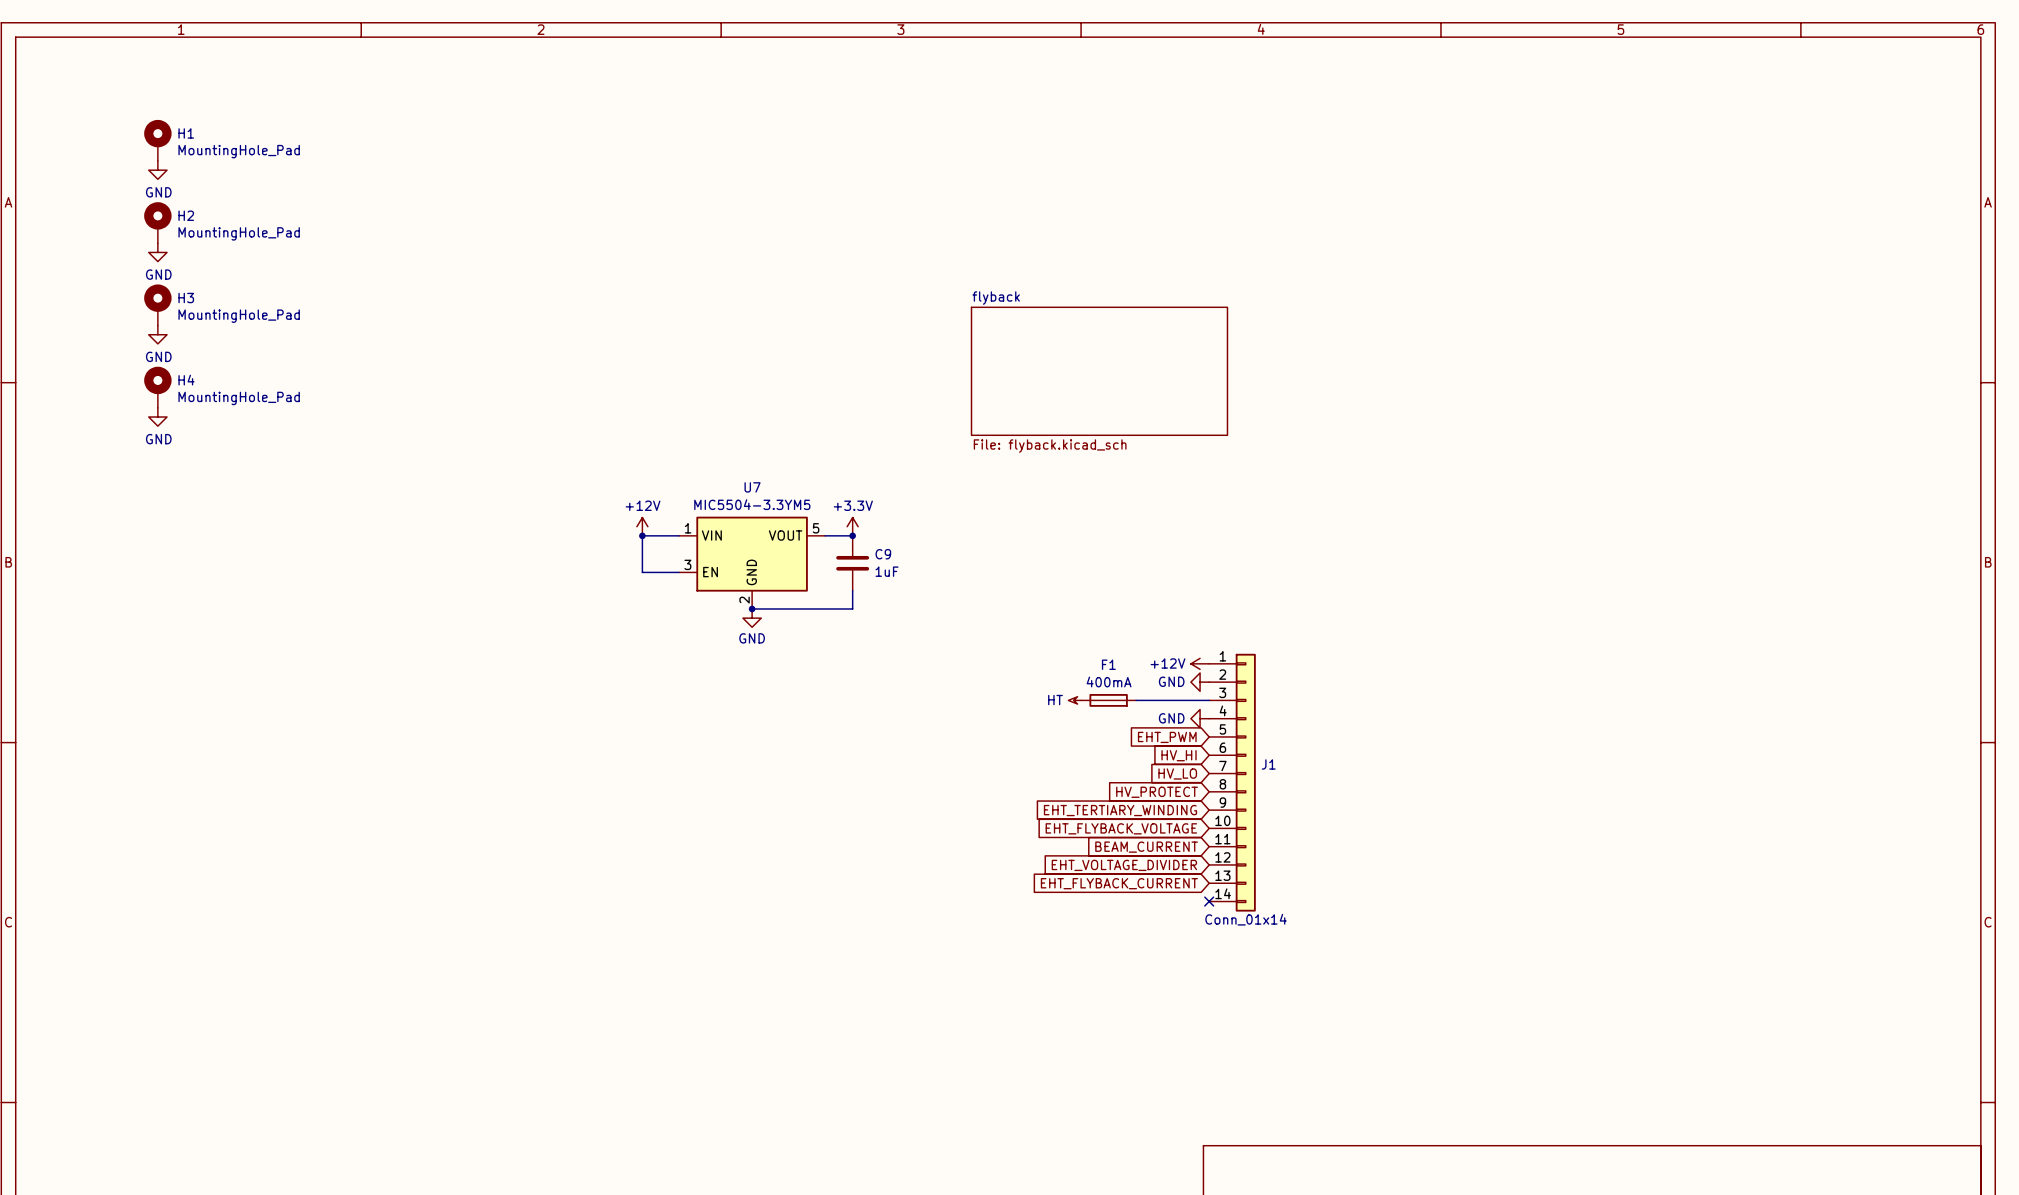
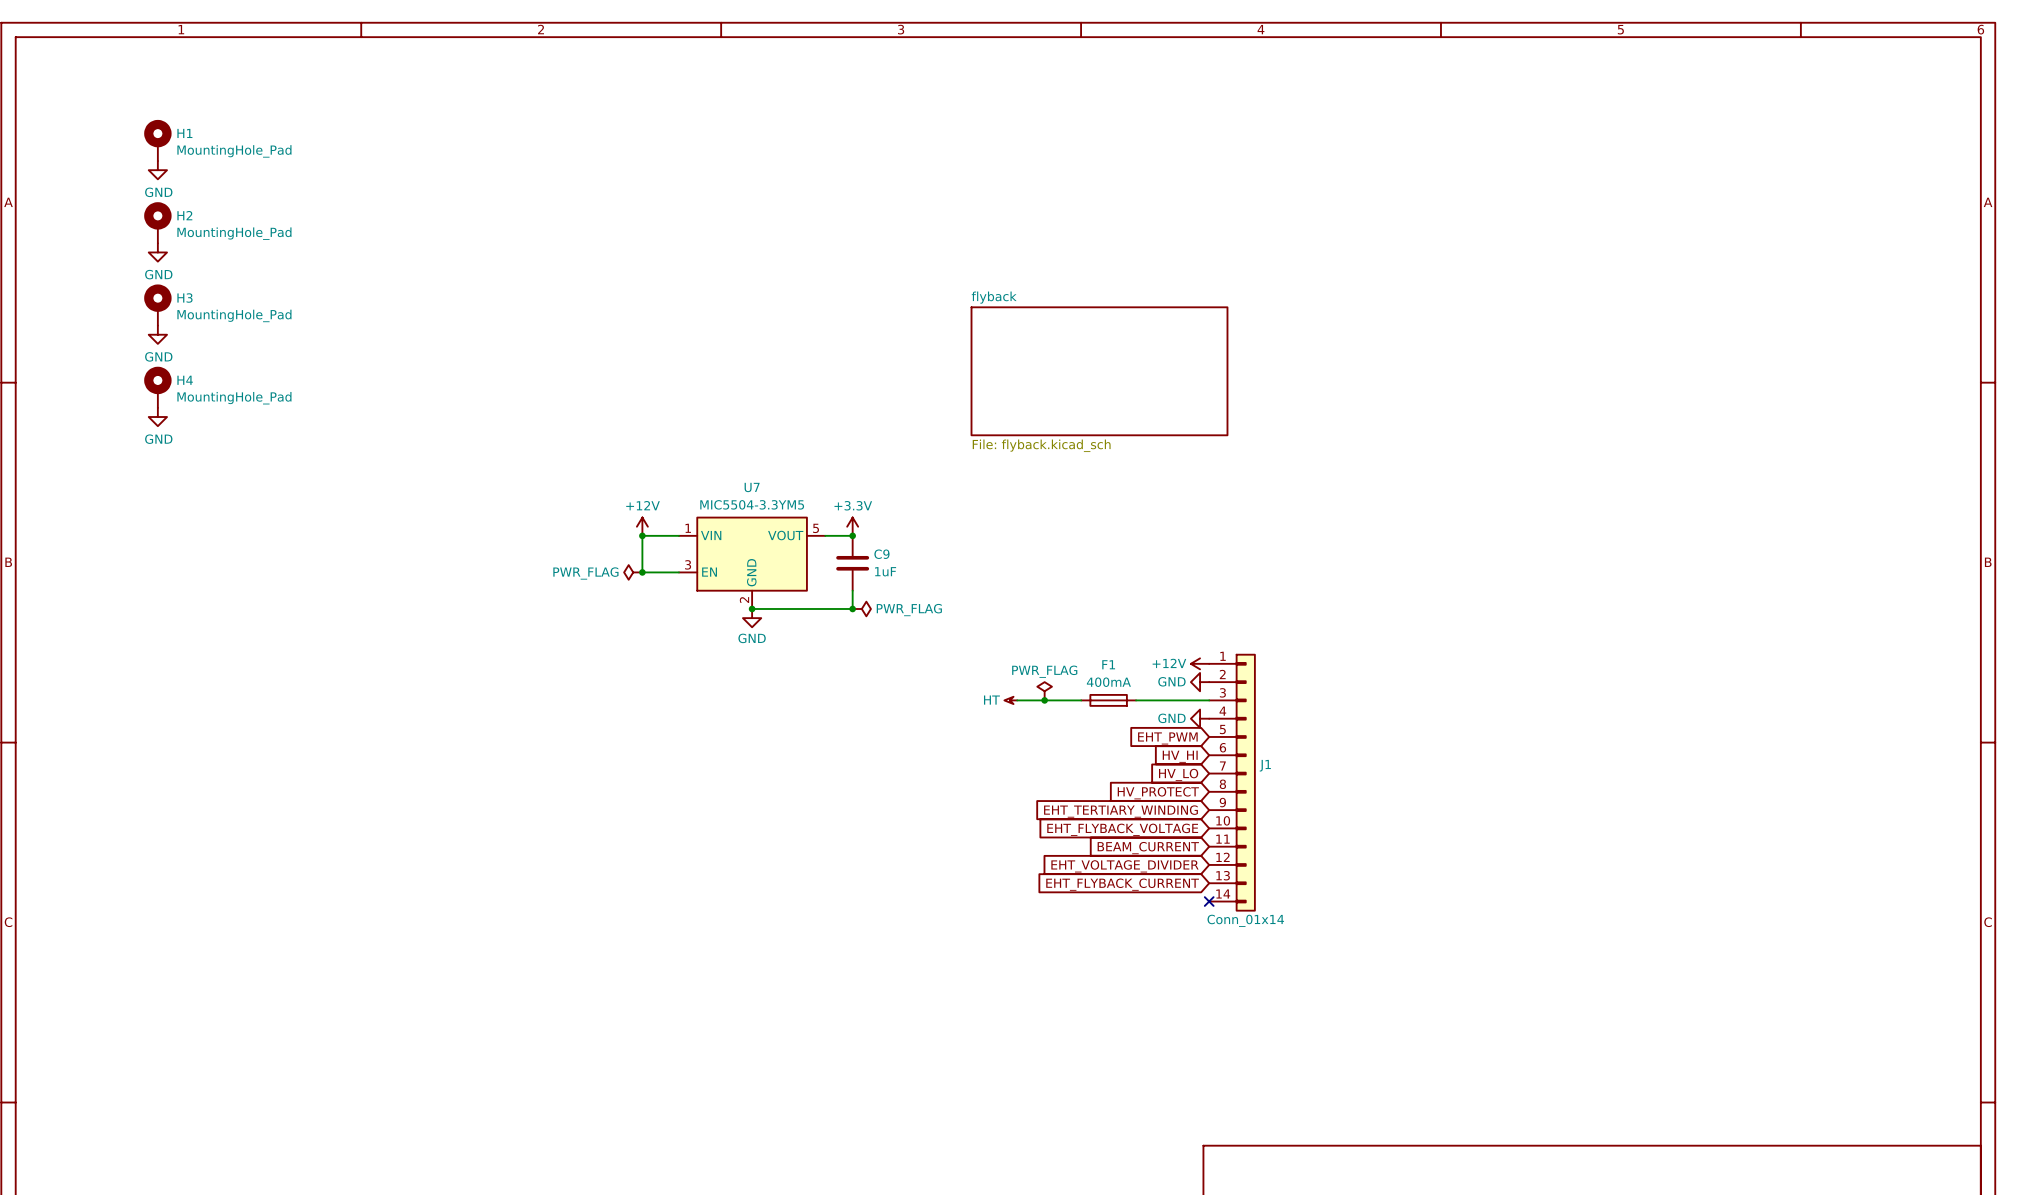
power symbol: none -> PWR_FLAG (633, 572)
junction: none -> (642, 572)
junction: none -> (852, 608)
power symbol: none -> PWR_FLAG (861, 608)
power symbol: none -> PWR_FLAG (1044, 691)
wire: none -> (1017, 700) (1081, 700)
junction: none -> (1044, 700)
power symbol position: HT (1074, 700) -> HT (1010, 700)

